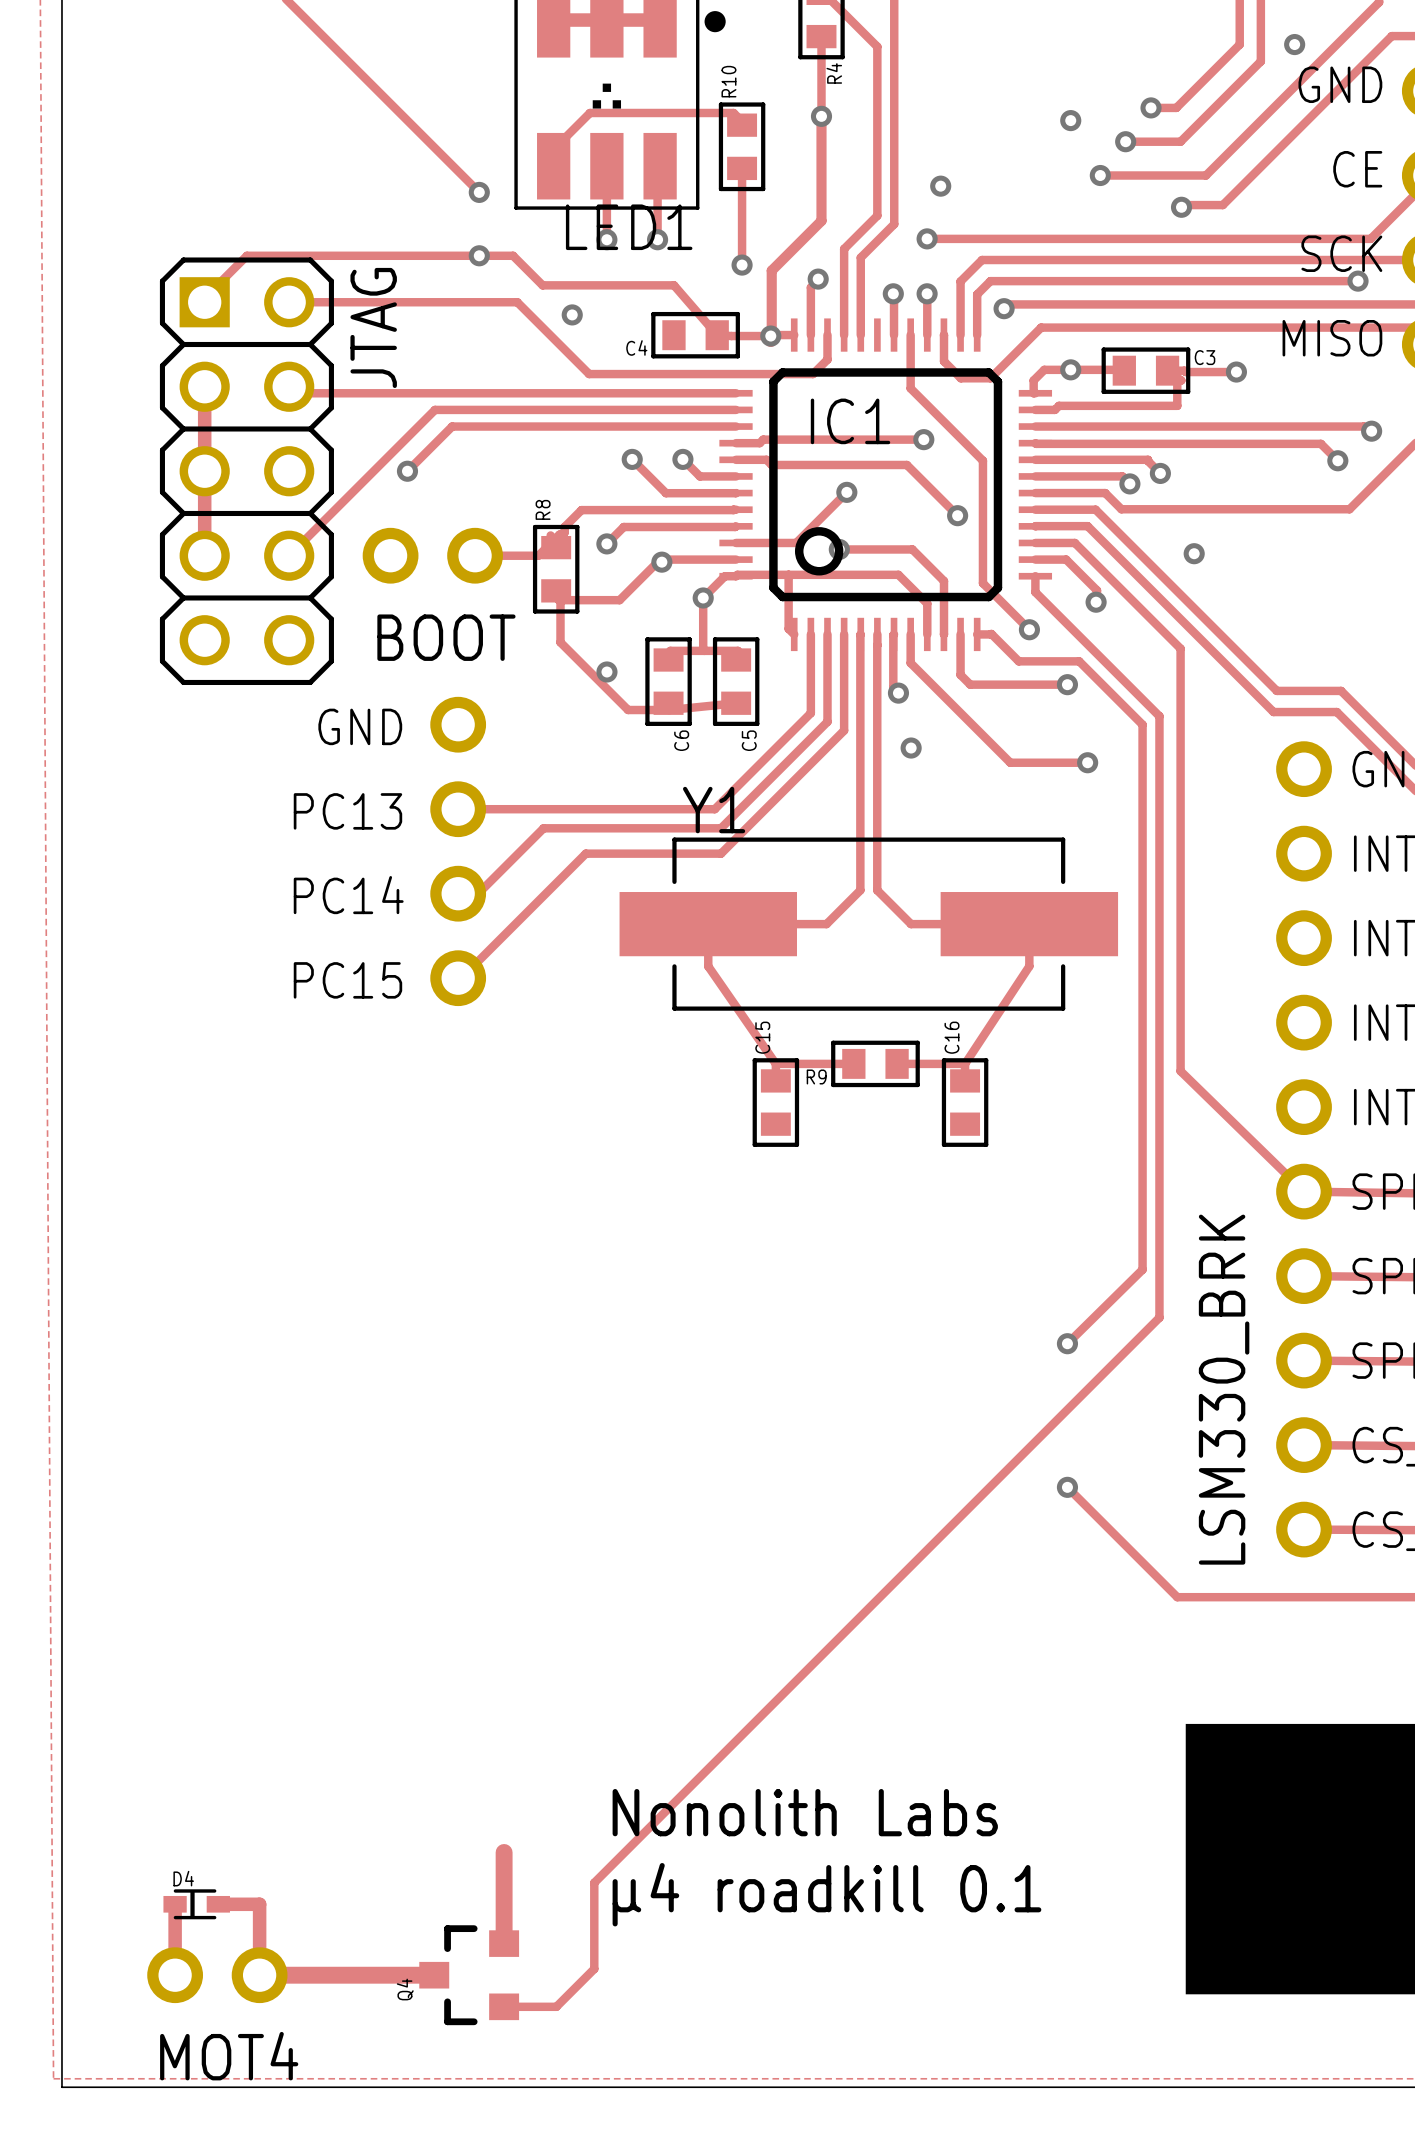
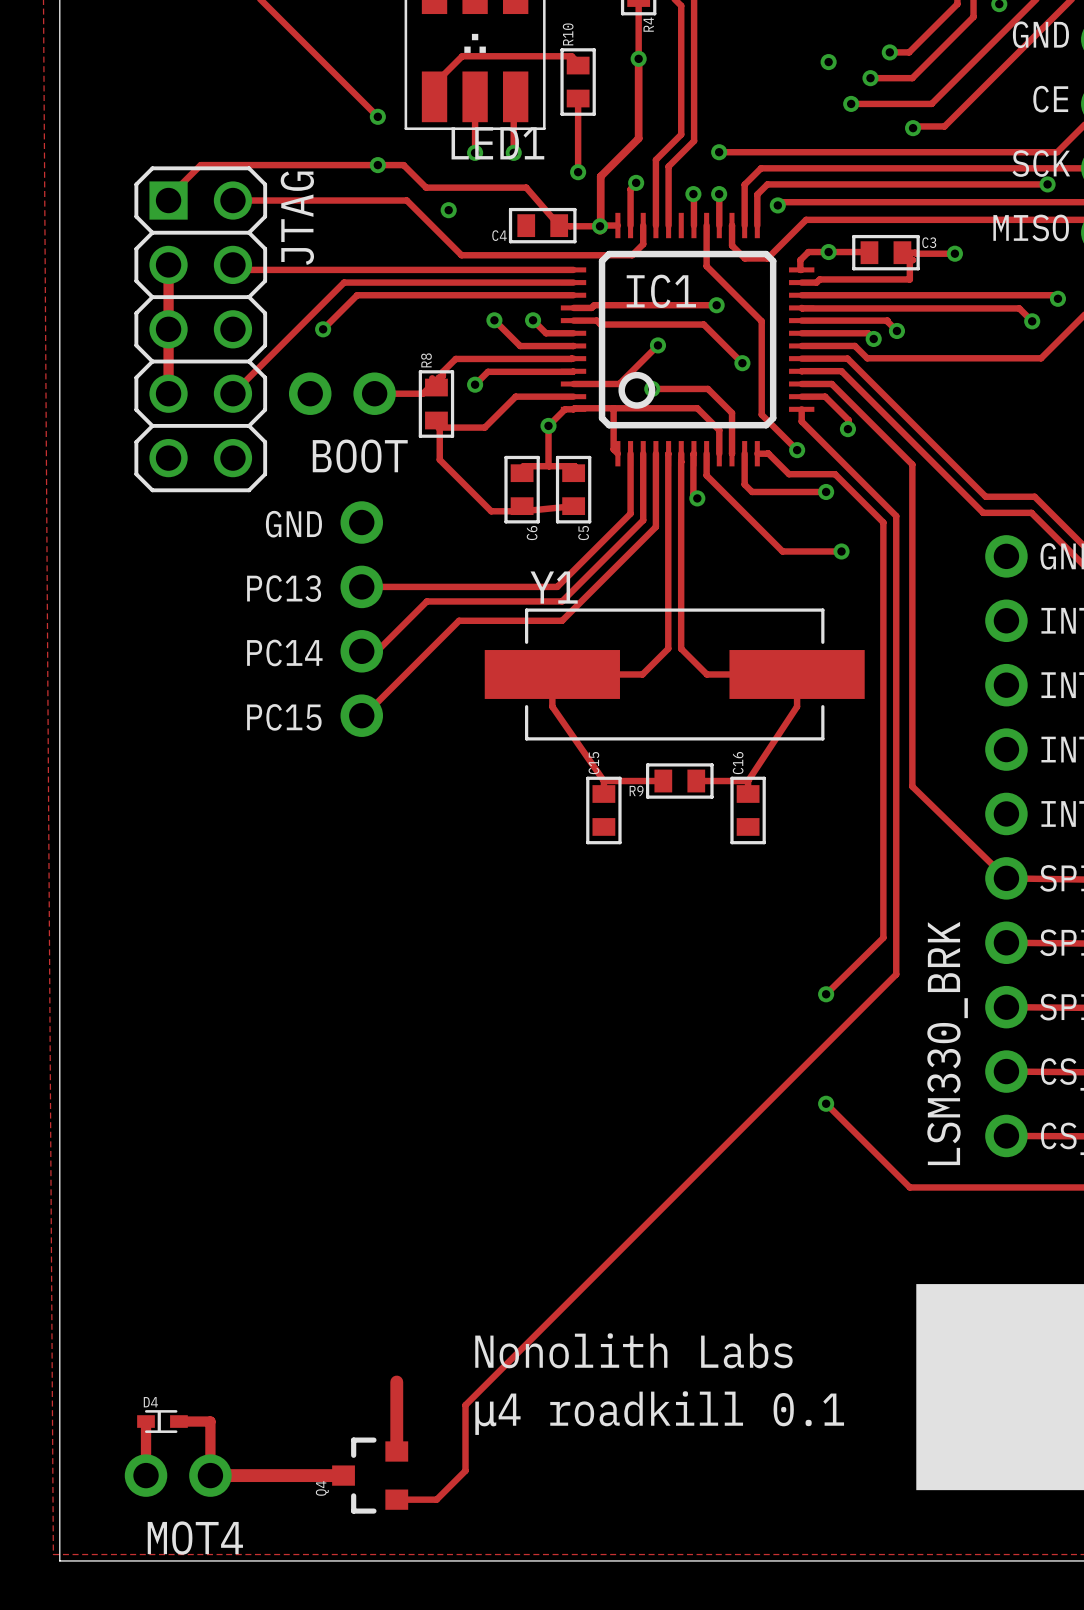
via: (940, 186) -> none
via: (1194, 553) -> none
via: (661, 562) -> none
via: (606, 671) -> none
via: (911, 748) -> none

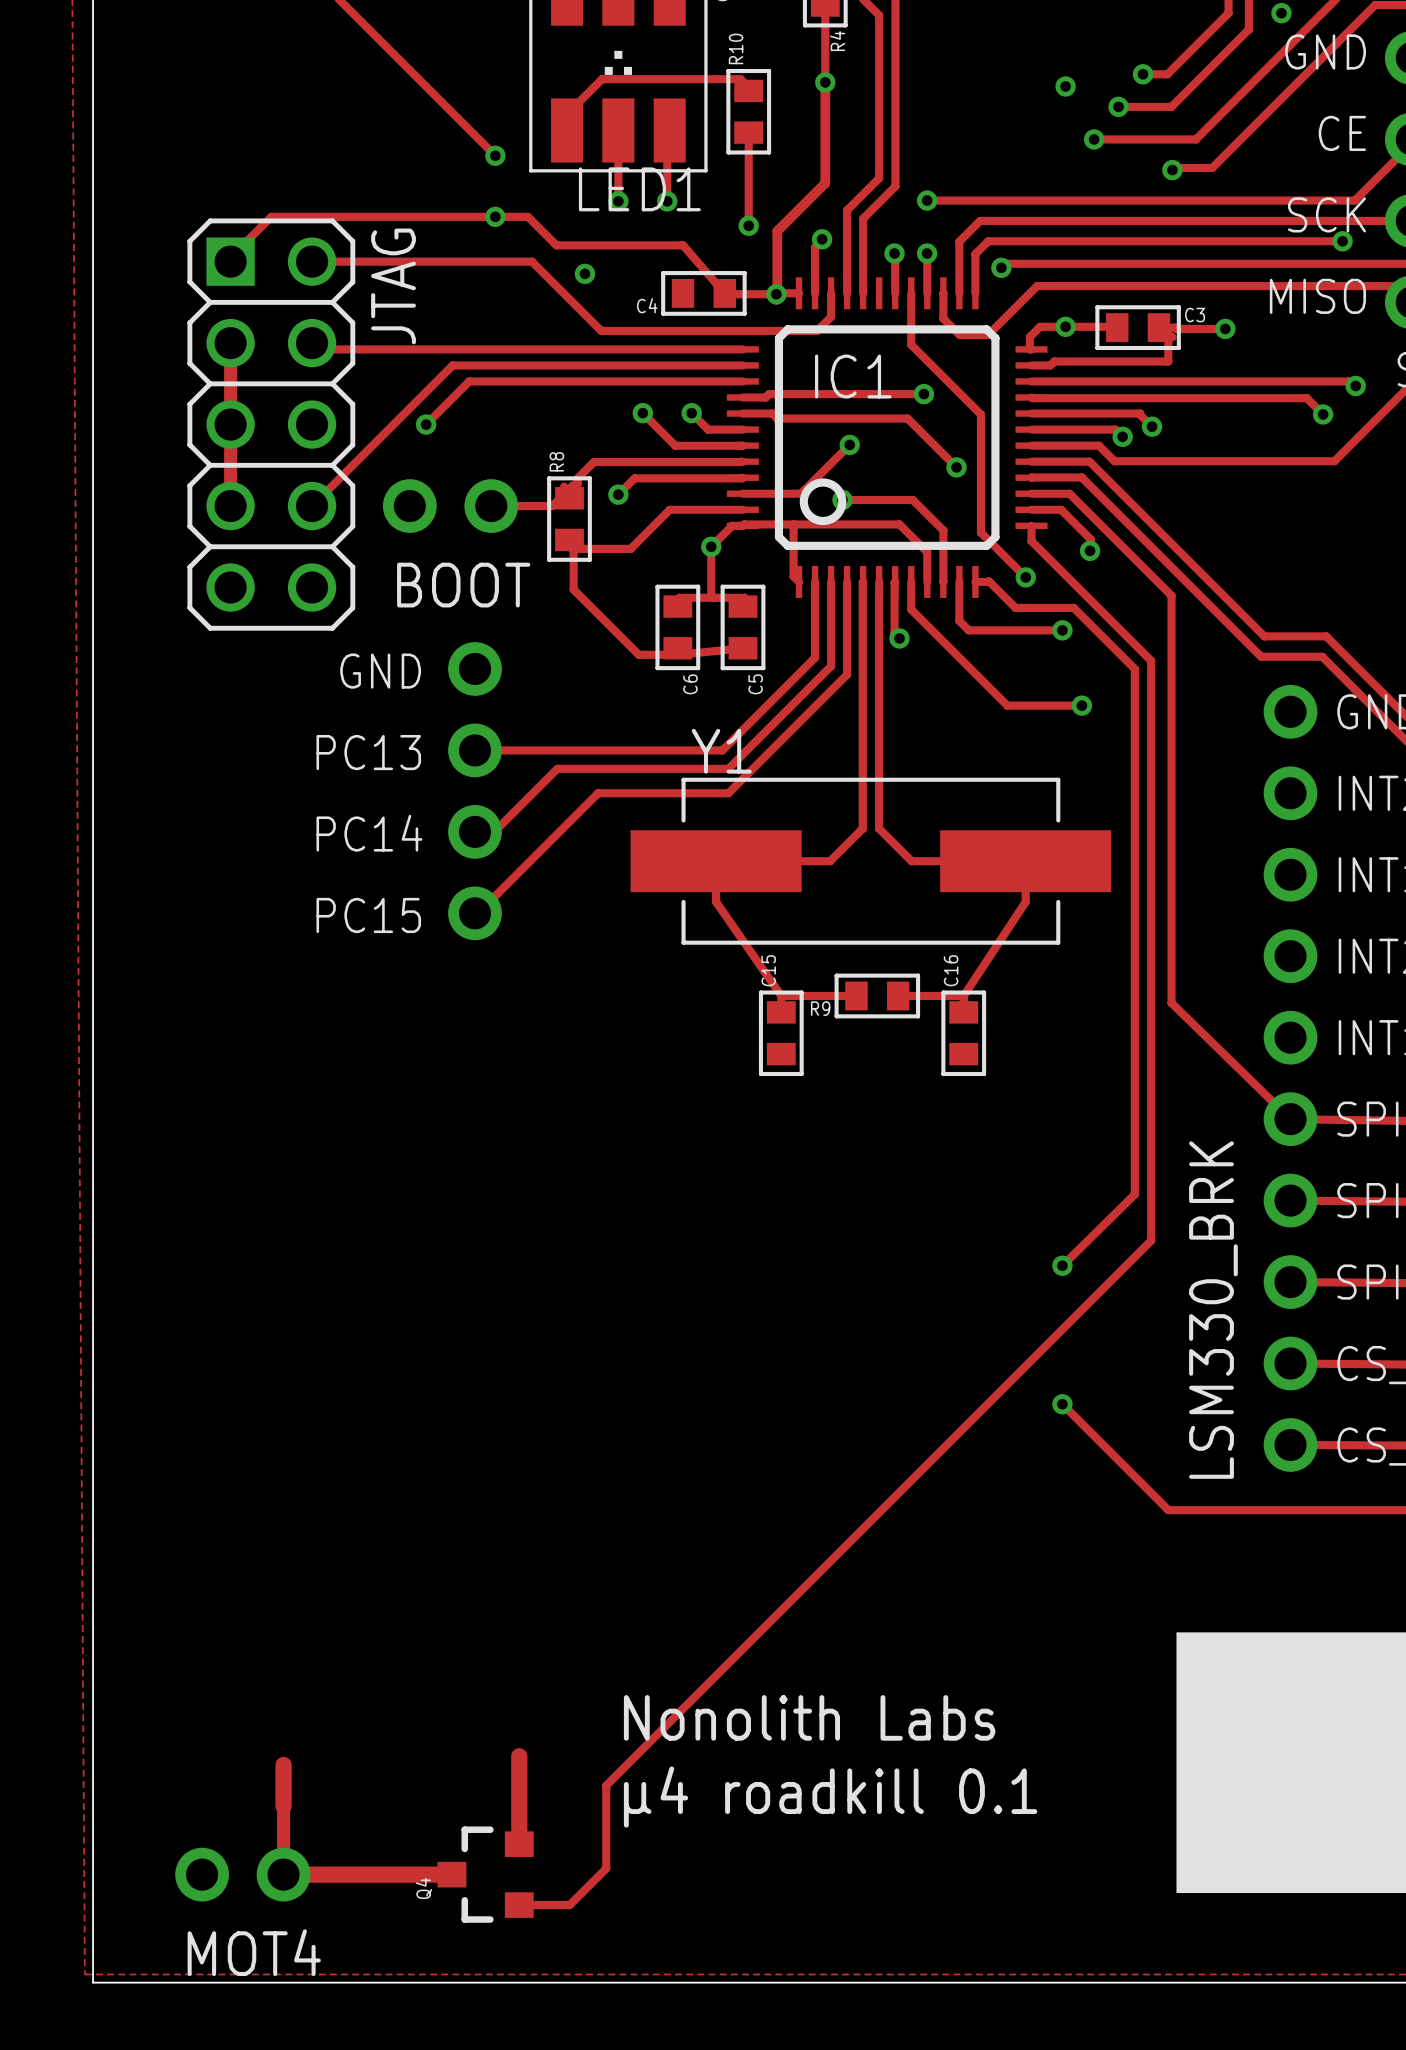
track: (146, 1421) (146, 1475) -> none
D4: (162, 1421) -> none
track: (178, 1421) (210, 1421) -> (283, 1764) (283, 1806)

